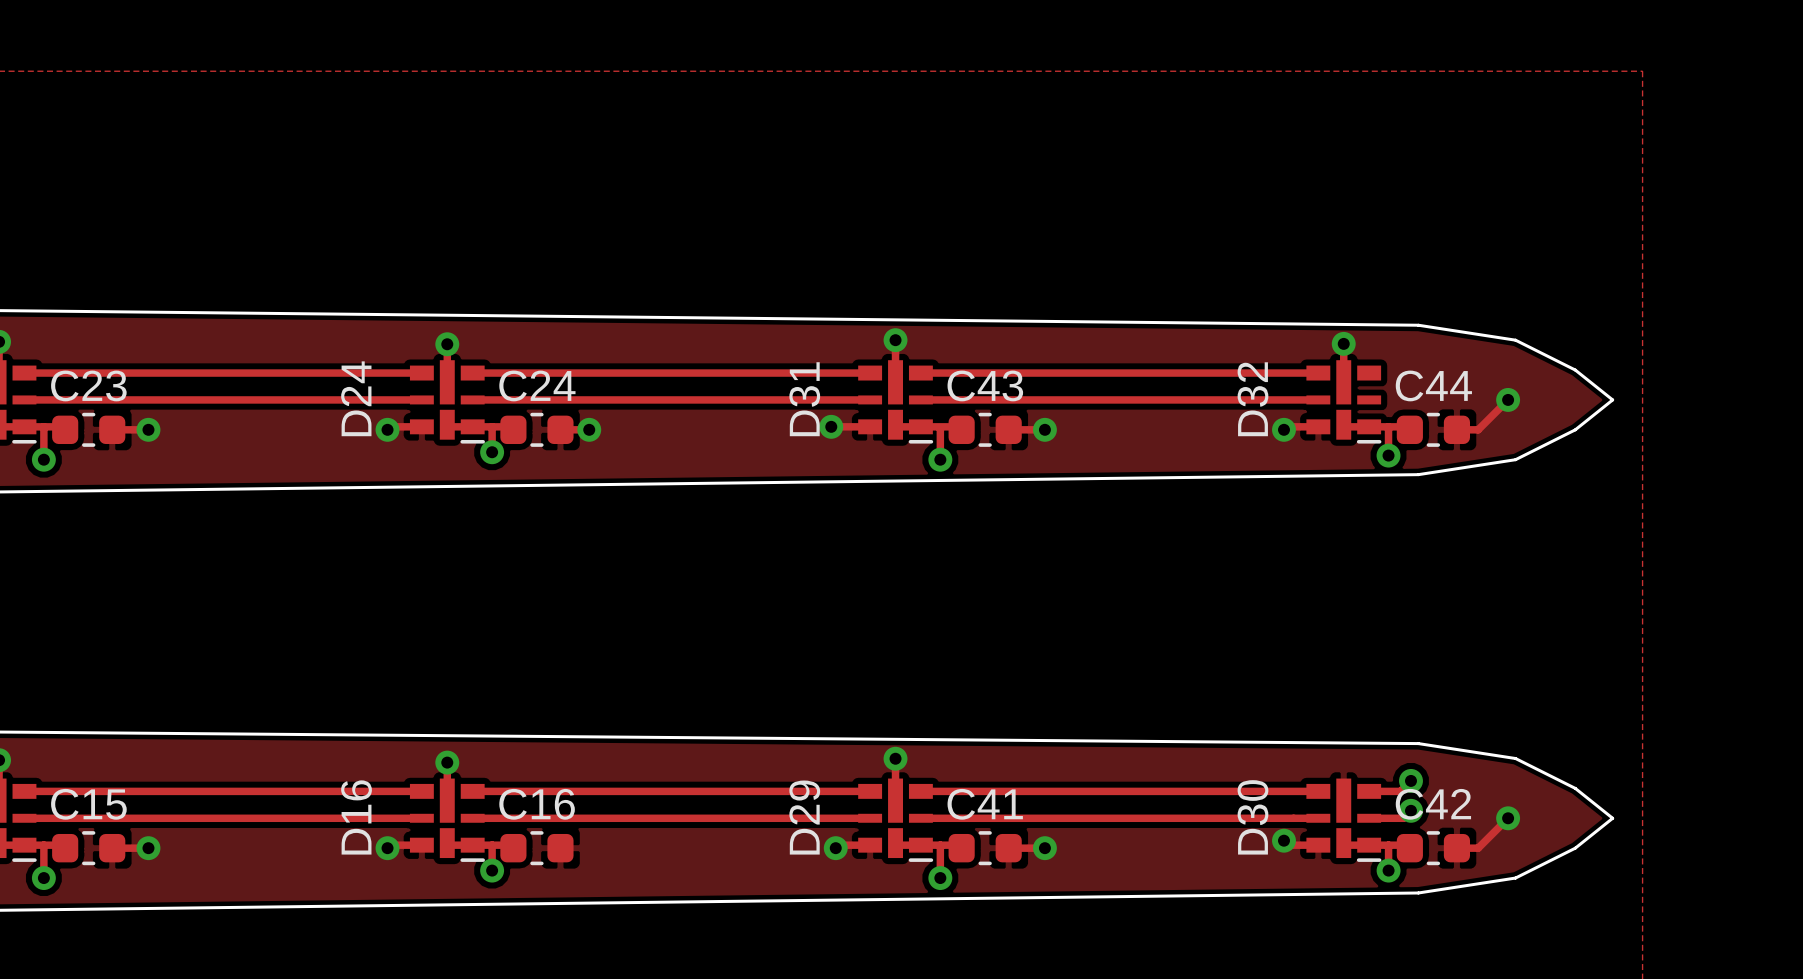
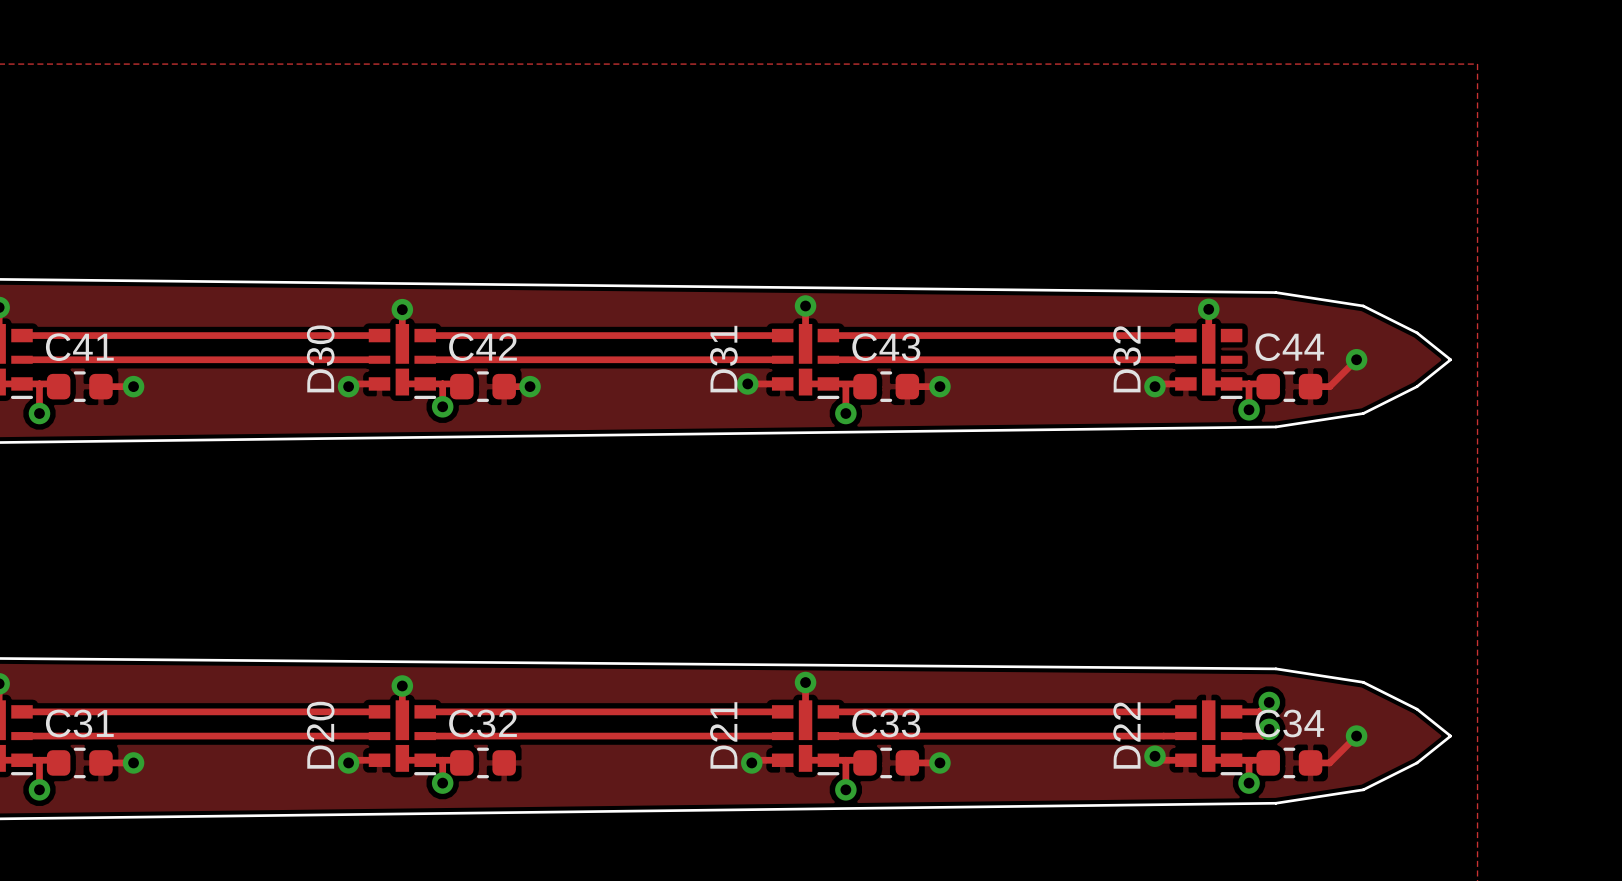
C23 name: C23 (88, 385) -> C41 (79, 347)
C24 name: C24 (537, 385) -> C42 (483, 347)
D24 name: D24 (356, 398) -> D30 (320, 358)
C15 name: C15 (88, 804) -> C31 (79, 723)
C16 name: C16 (537, 804) -> C32 (483, 723)
C41 name: C41 (985, 804) -> C33 (886, 723)
C42 name: C42 (1433, 804) -> C34 (1289, 723)
D16 name: D16 (356, 817) -> D20 (320, 735)
D29 name: D29 (804, 817) -> D21 (723, 735)
D30 name: D30 (1252, 817) -> D22 (1126, 735)

